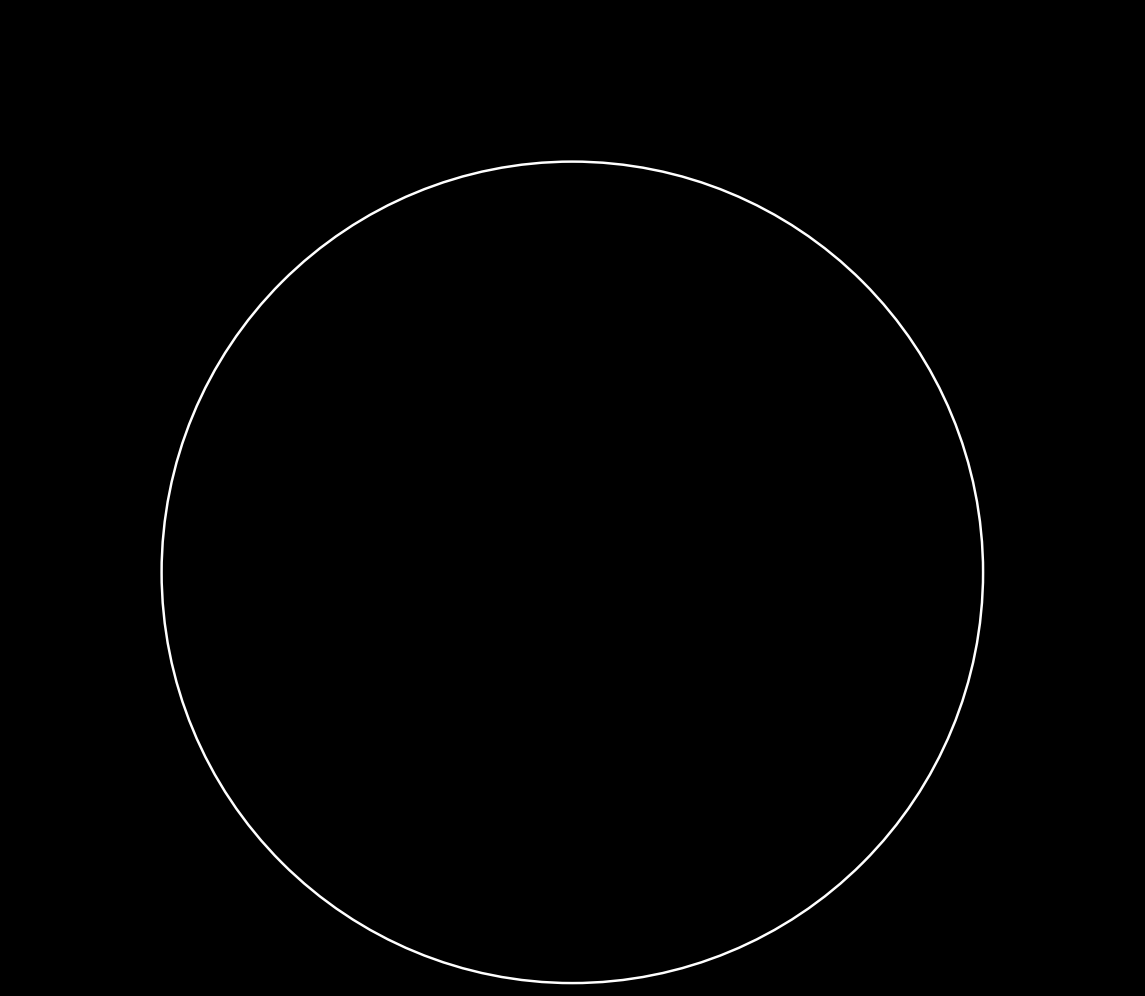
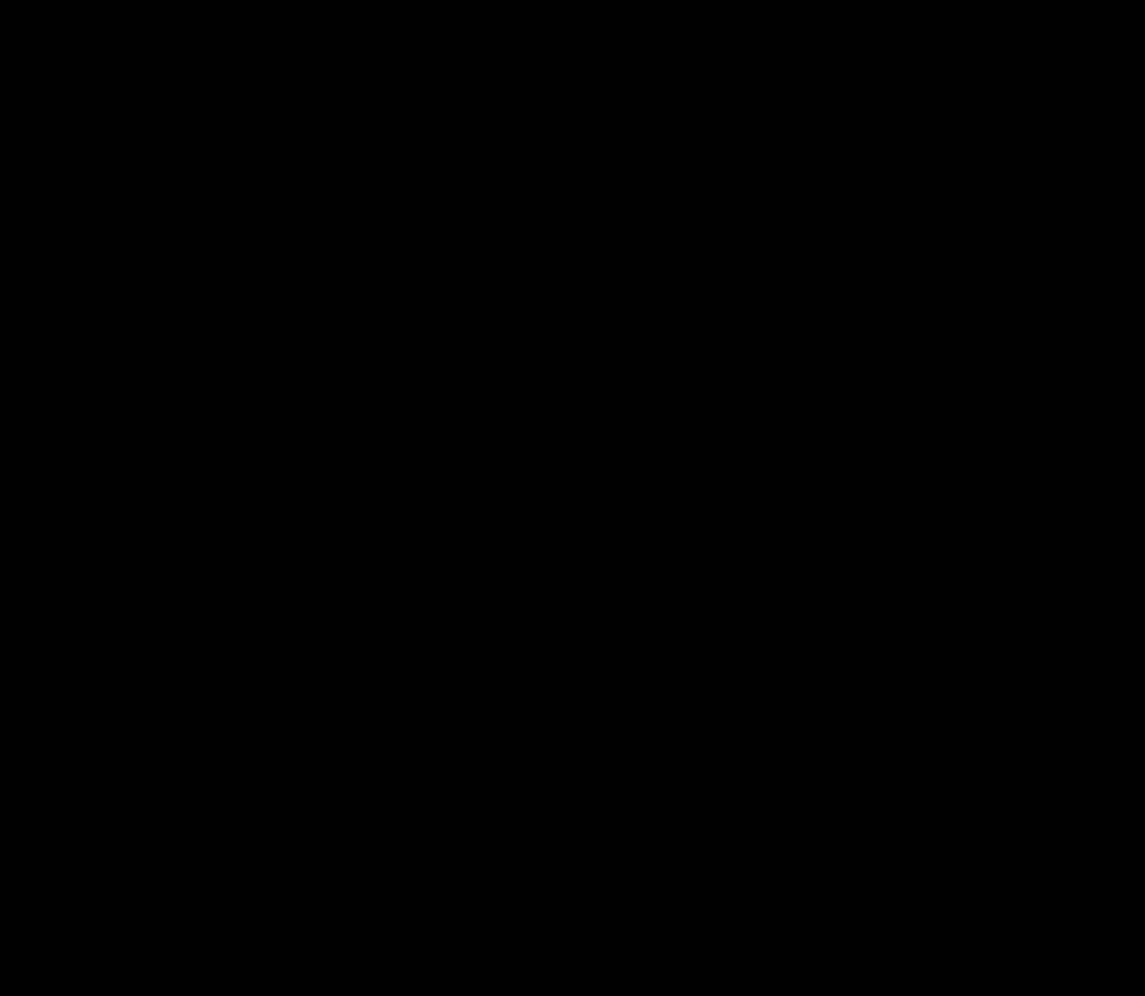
part: (572, 572) -> none

